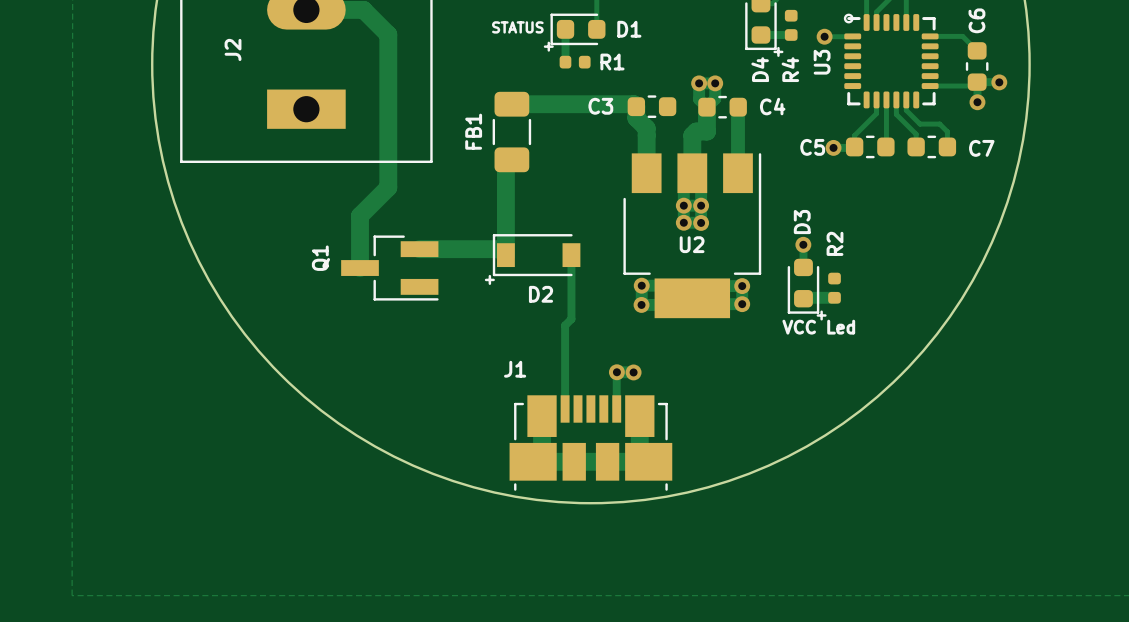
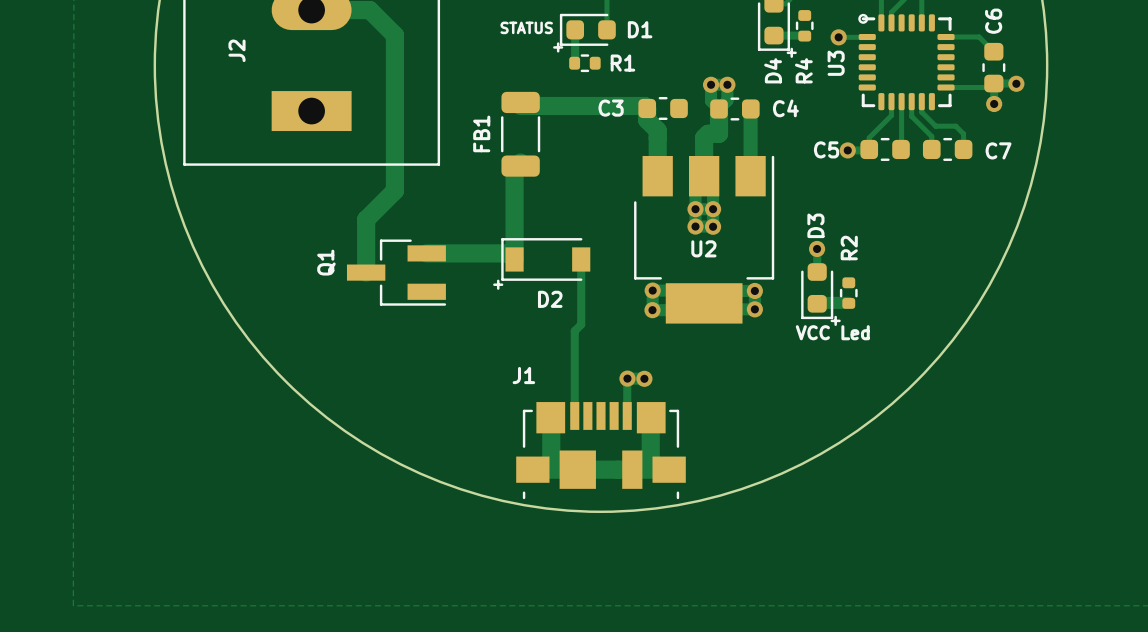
R4 footprint: [784, 9, 798, 41] -> [795, 10, 814, 42]
R1 footprint: [559, 55, 591, 69] -> [569, 54, 601, 73]
FB1 footprint: [492, 91, 532, 173] -> [501, 91, 541, 177]
R2 footprint: [828, 272, 841, 304] -> [839, 277, 858, 309]
J1 footprint: [509, 395, 673, 491] -> [516, 402, 686, 500]

